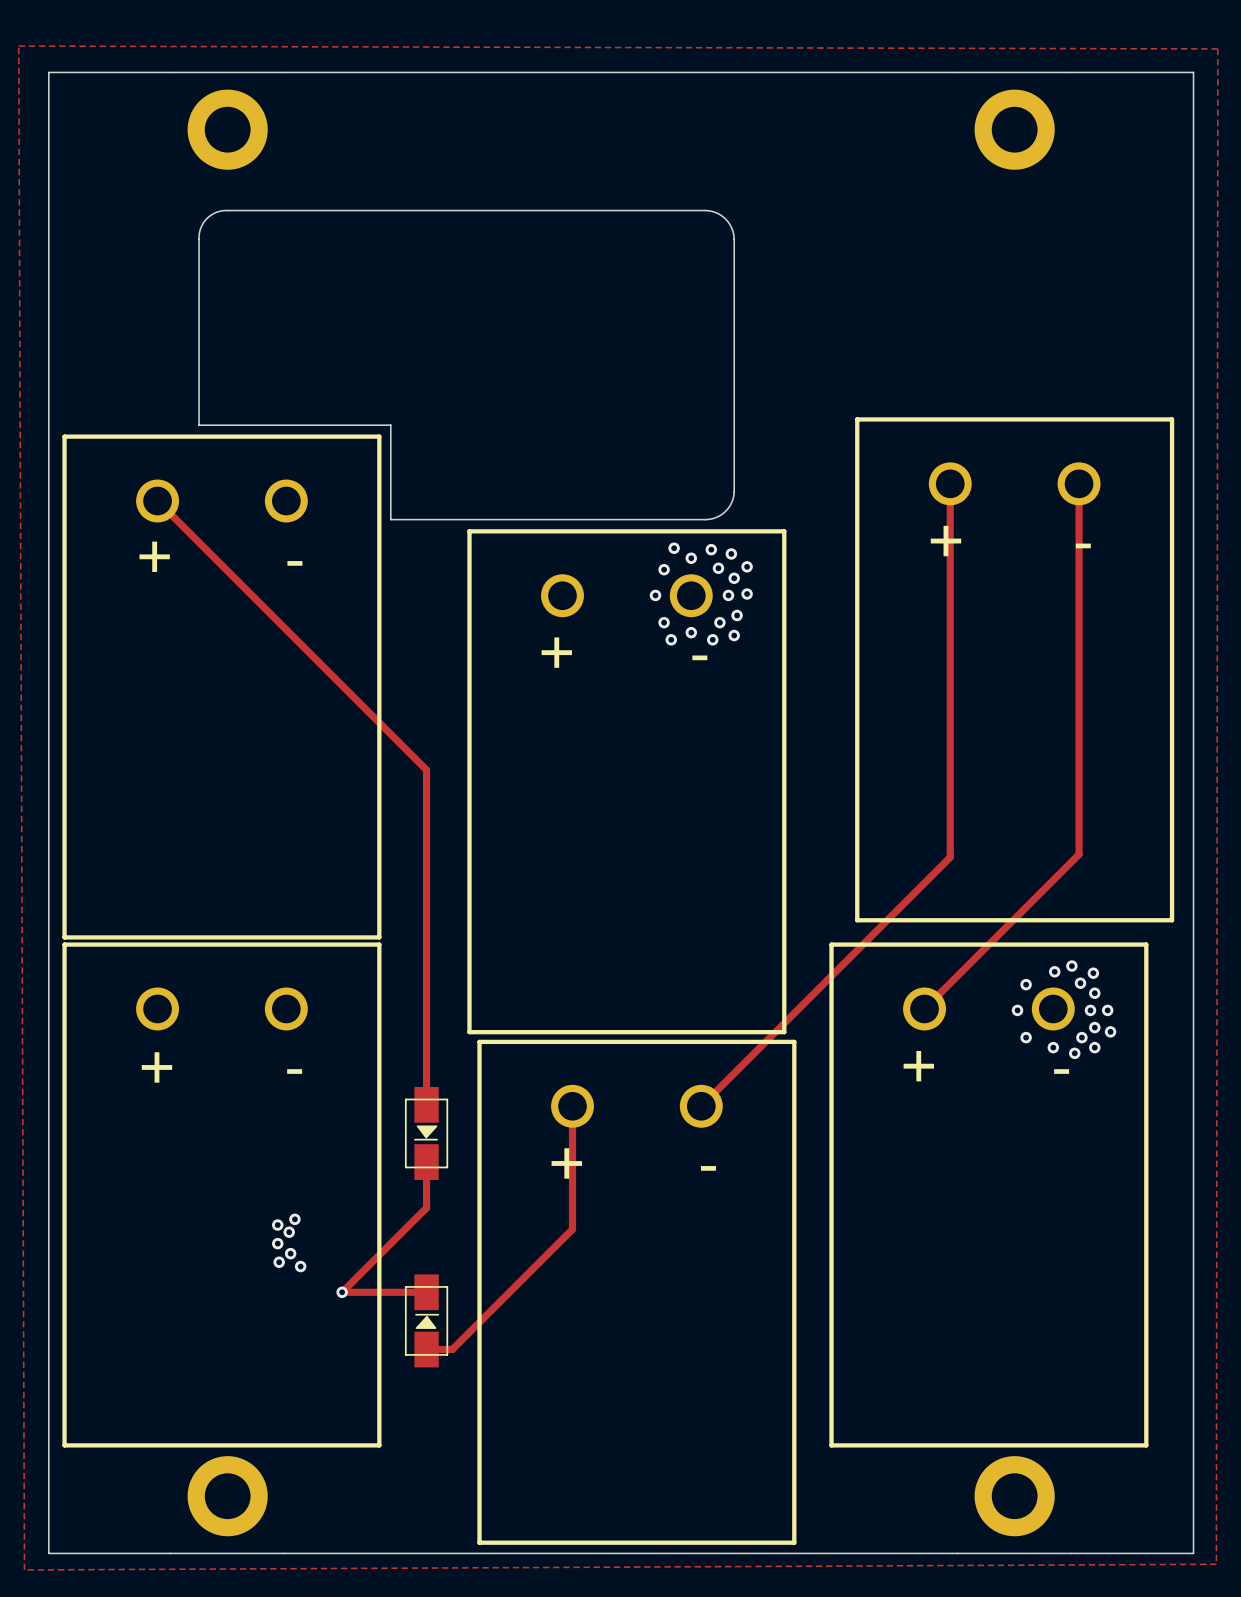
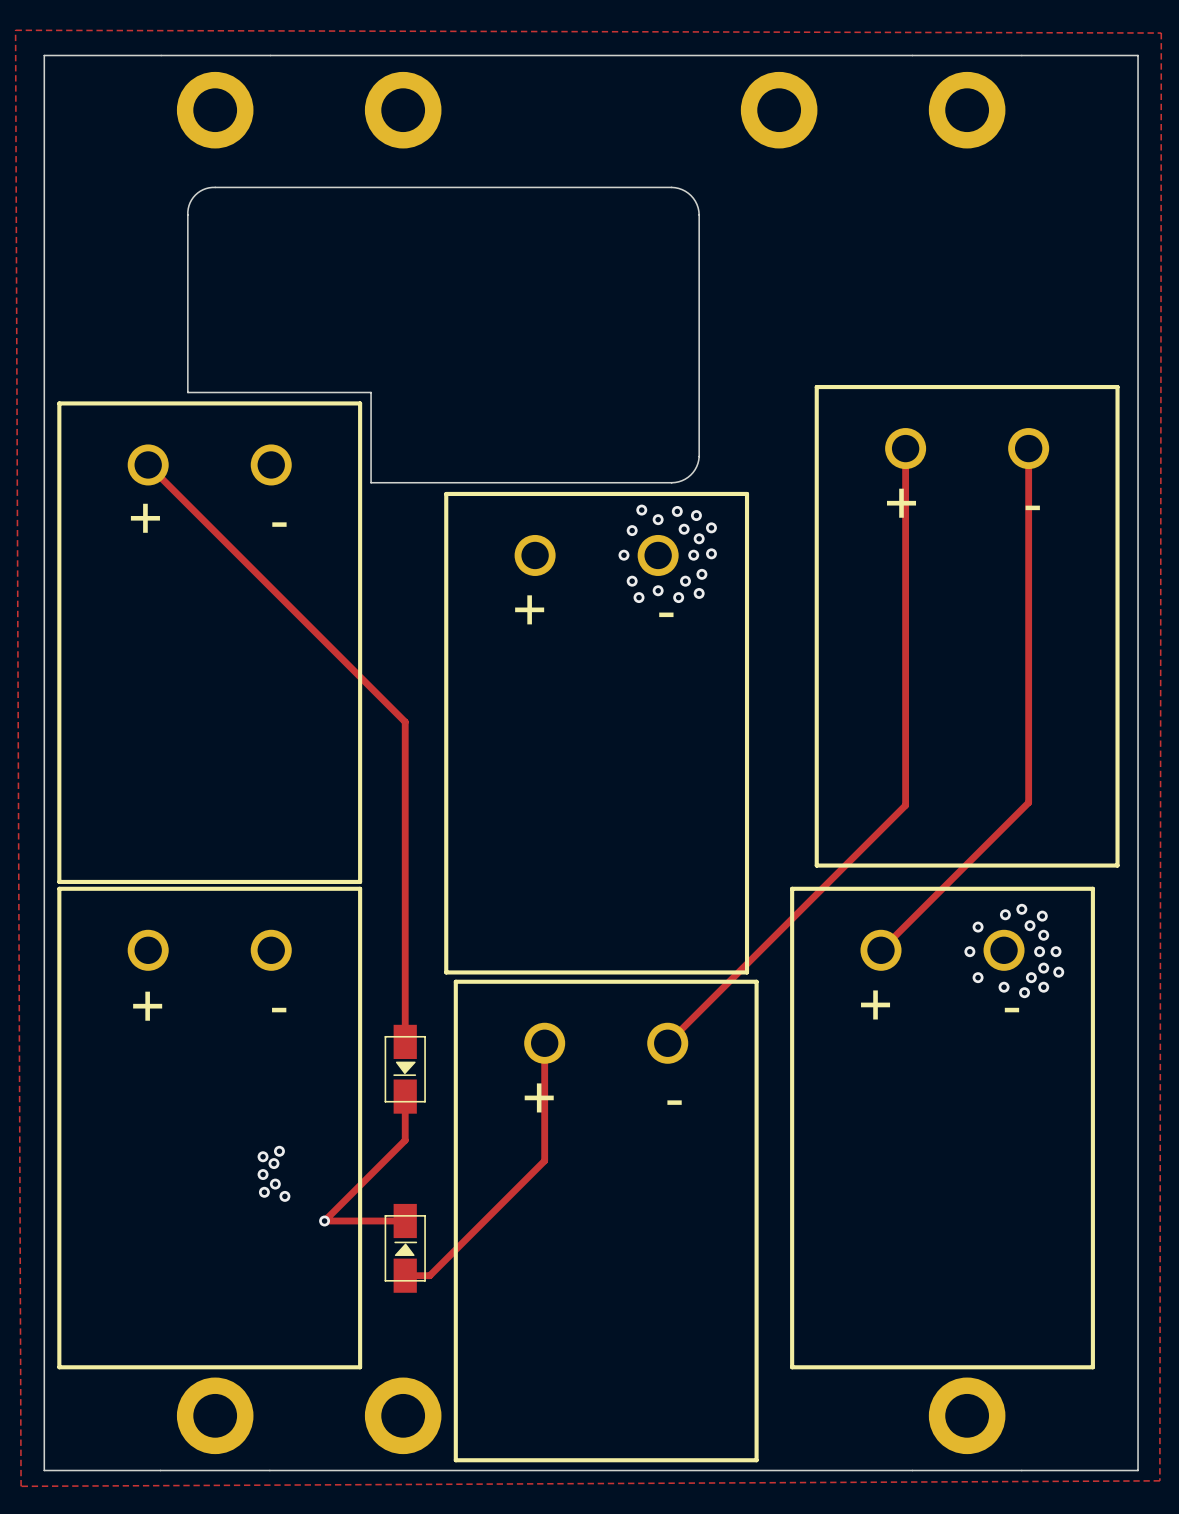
part: none -> (403, 110)
part: none -> (779, 110)
part: none -> (403, 1415)

